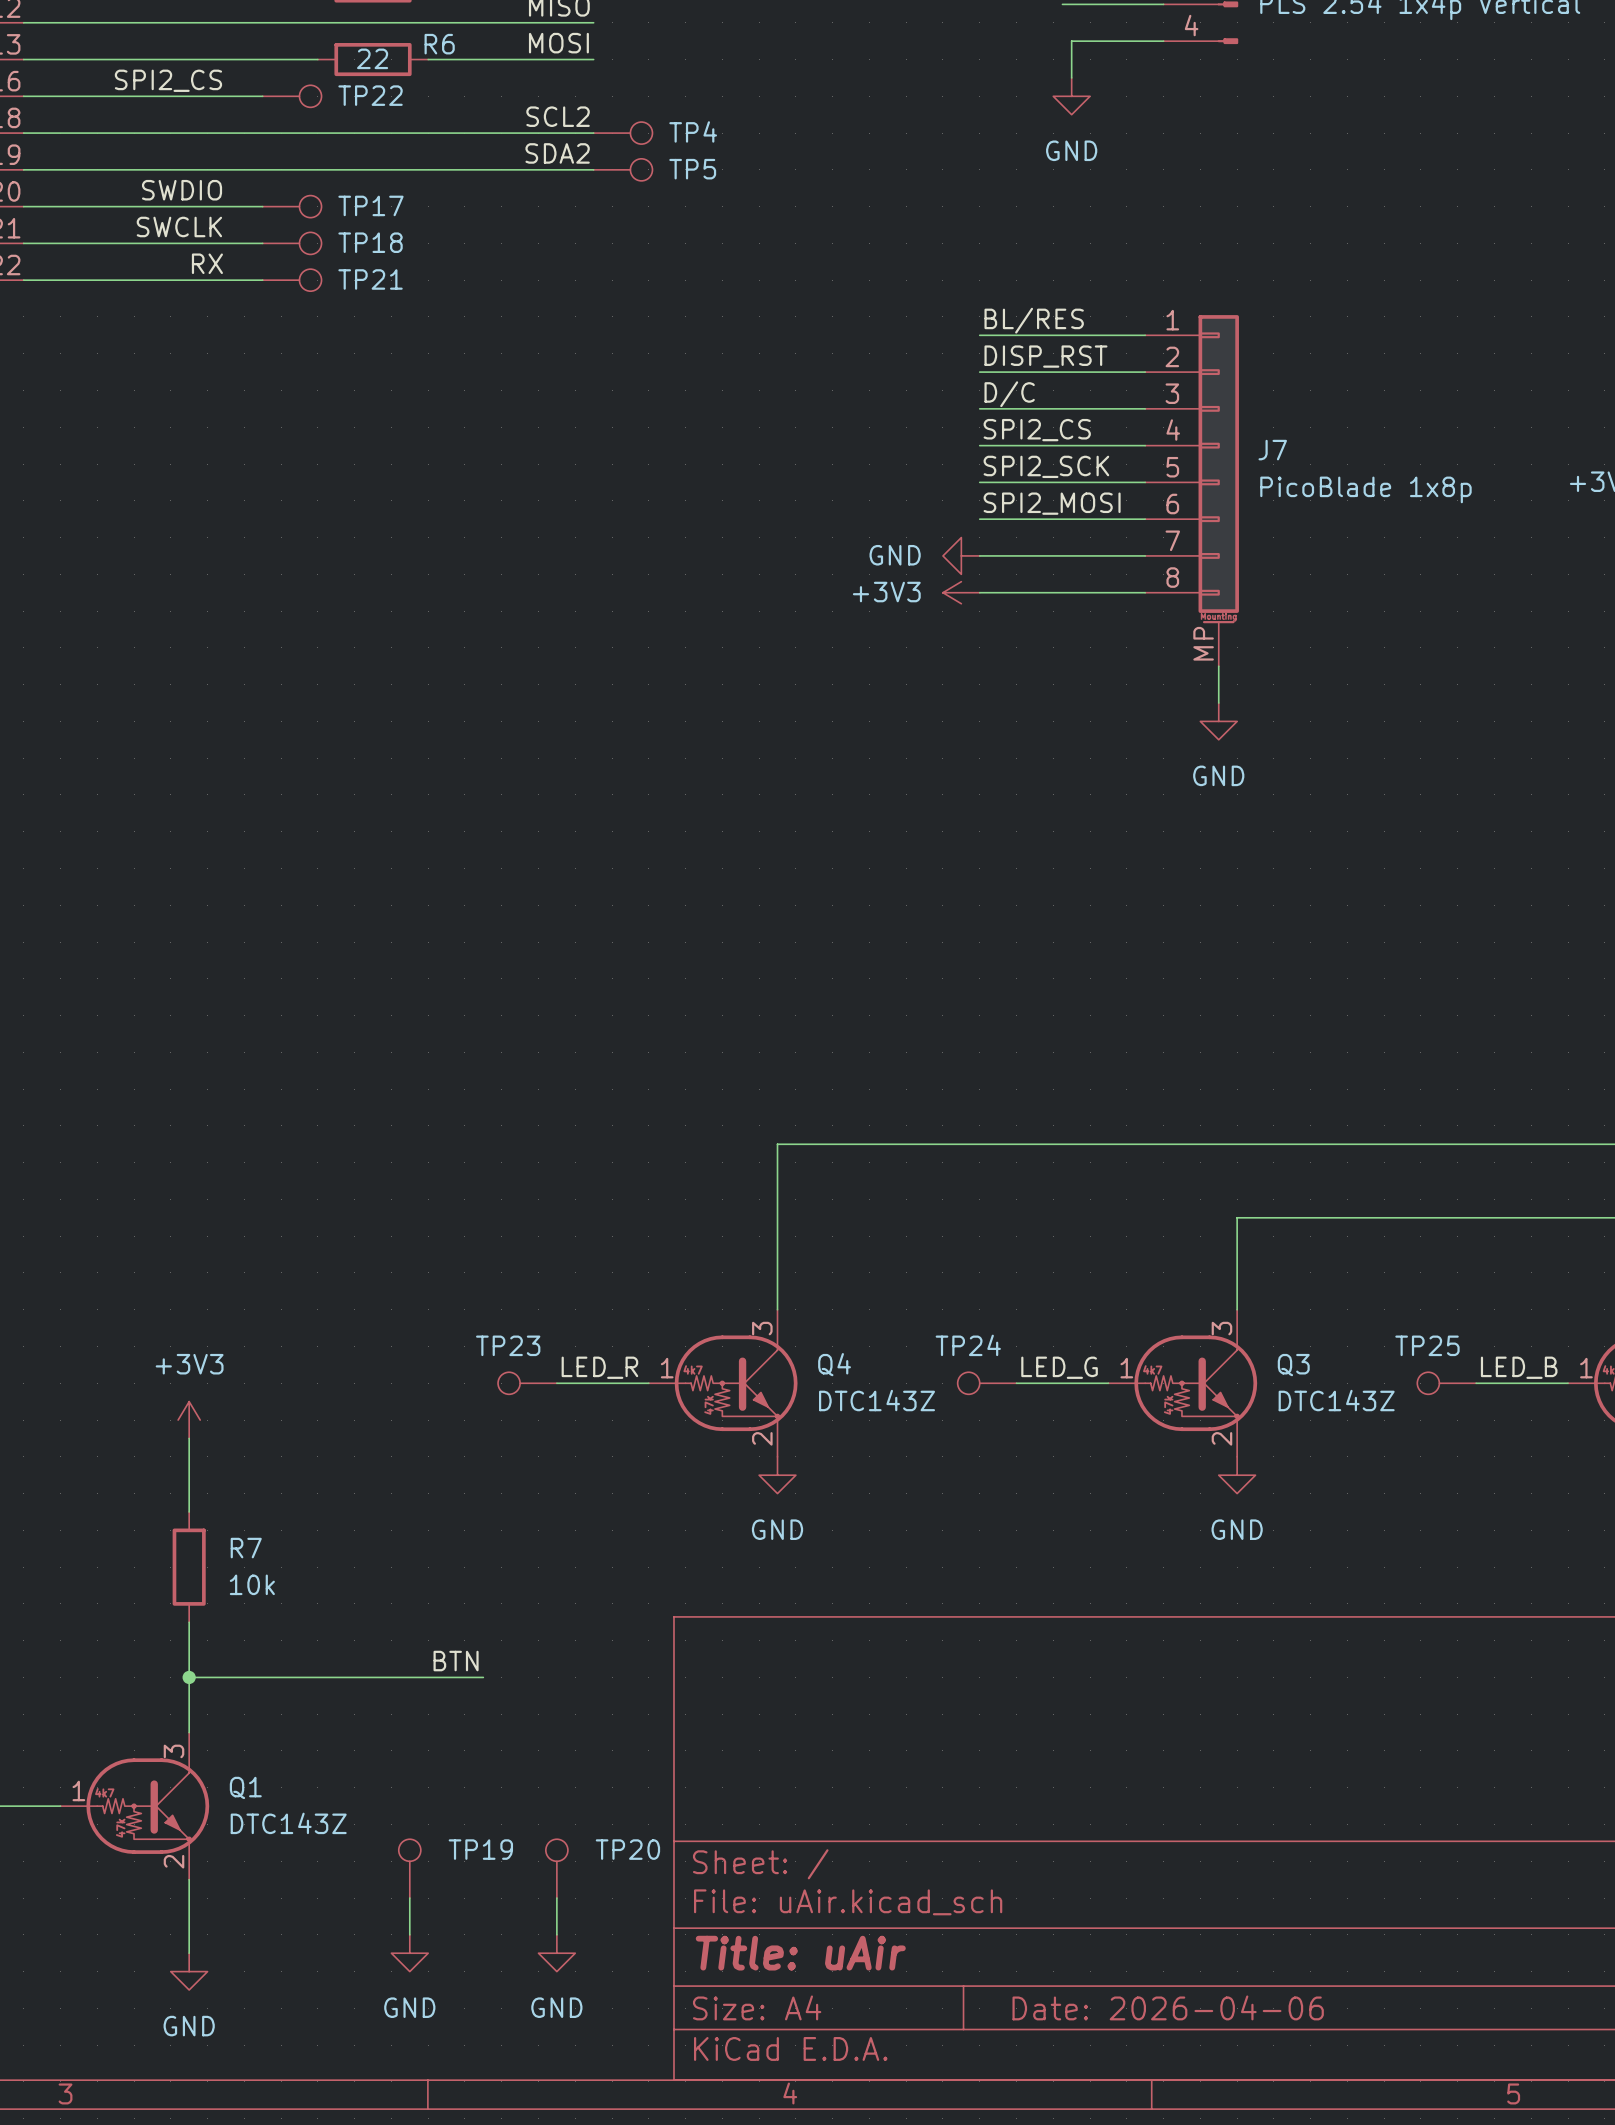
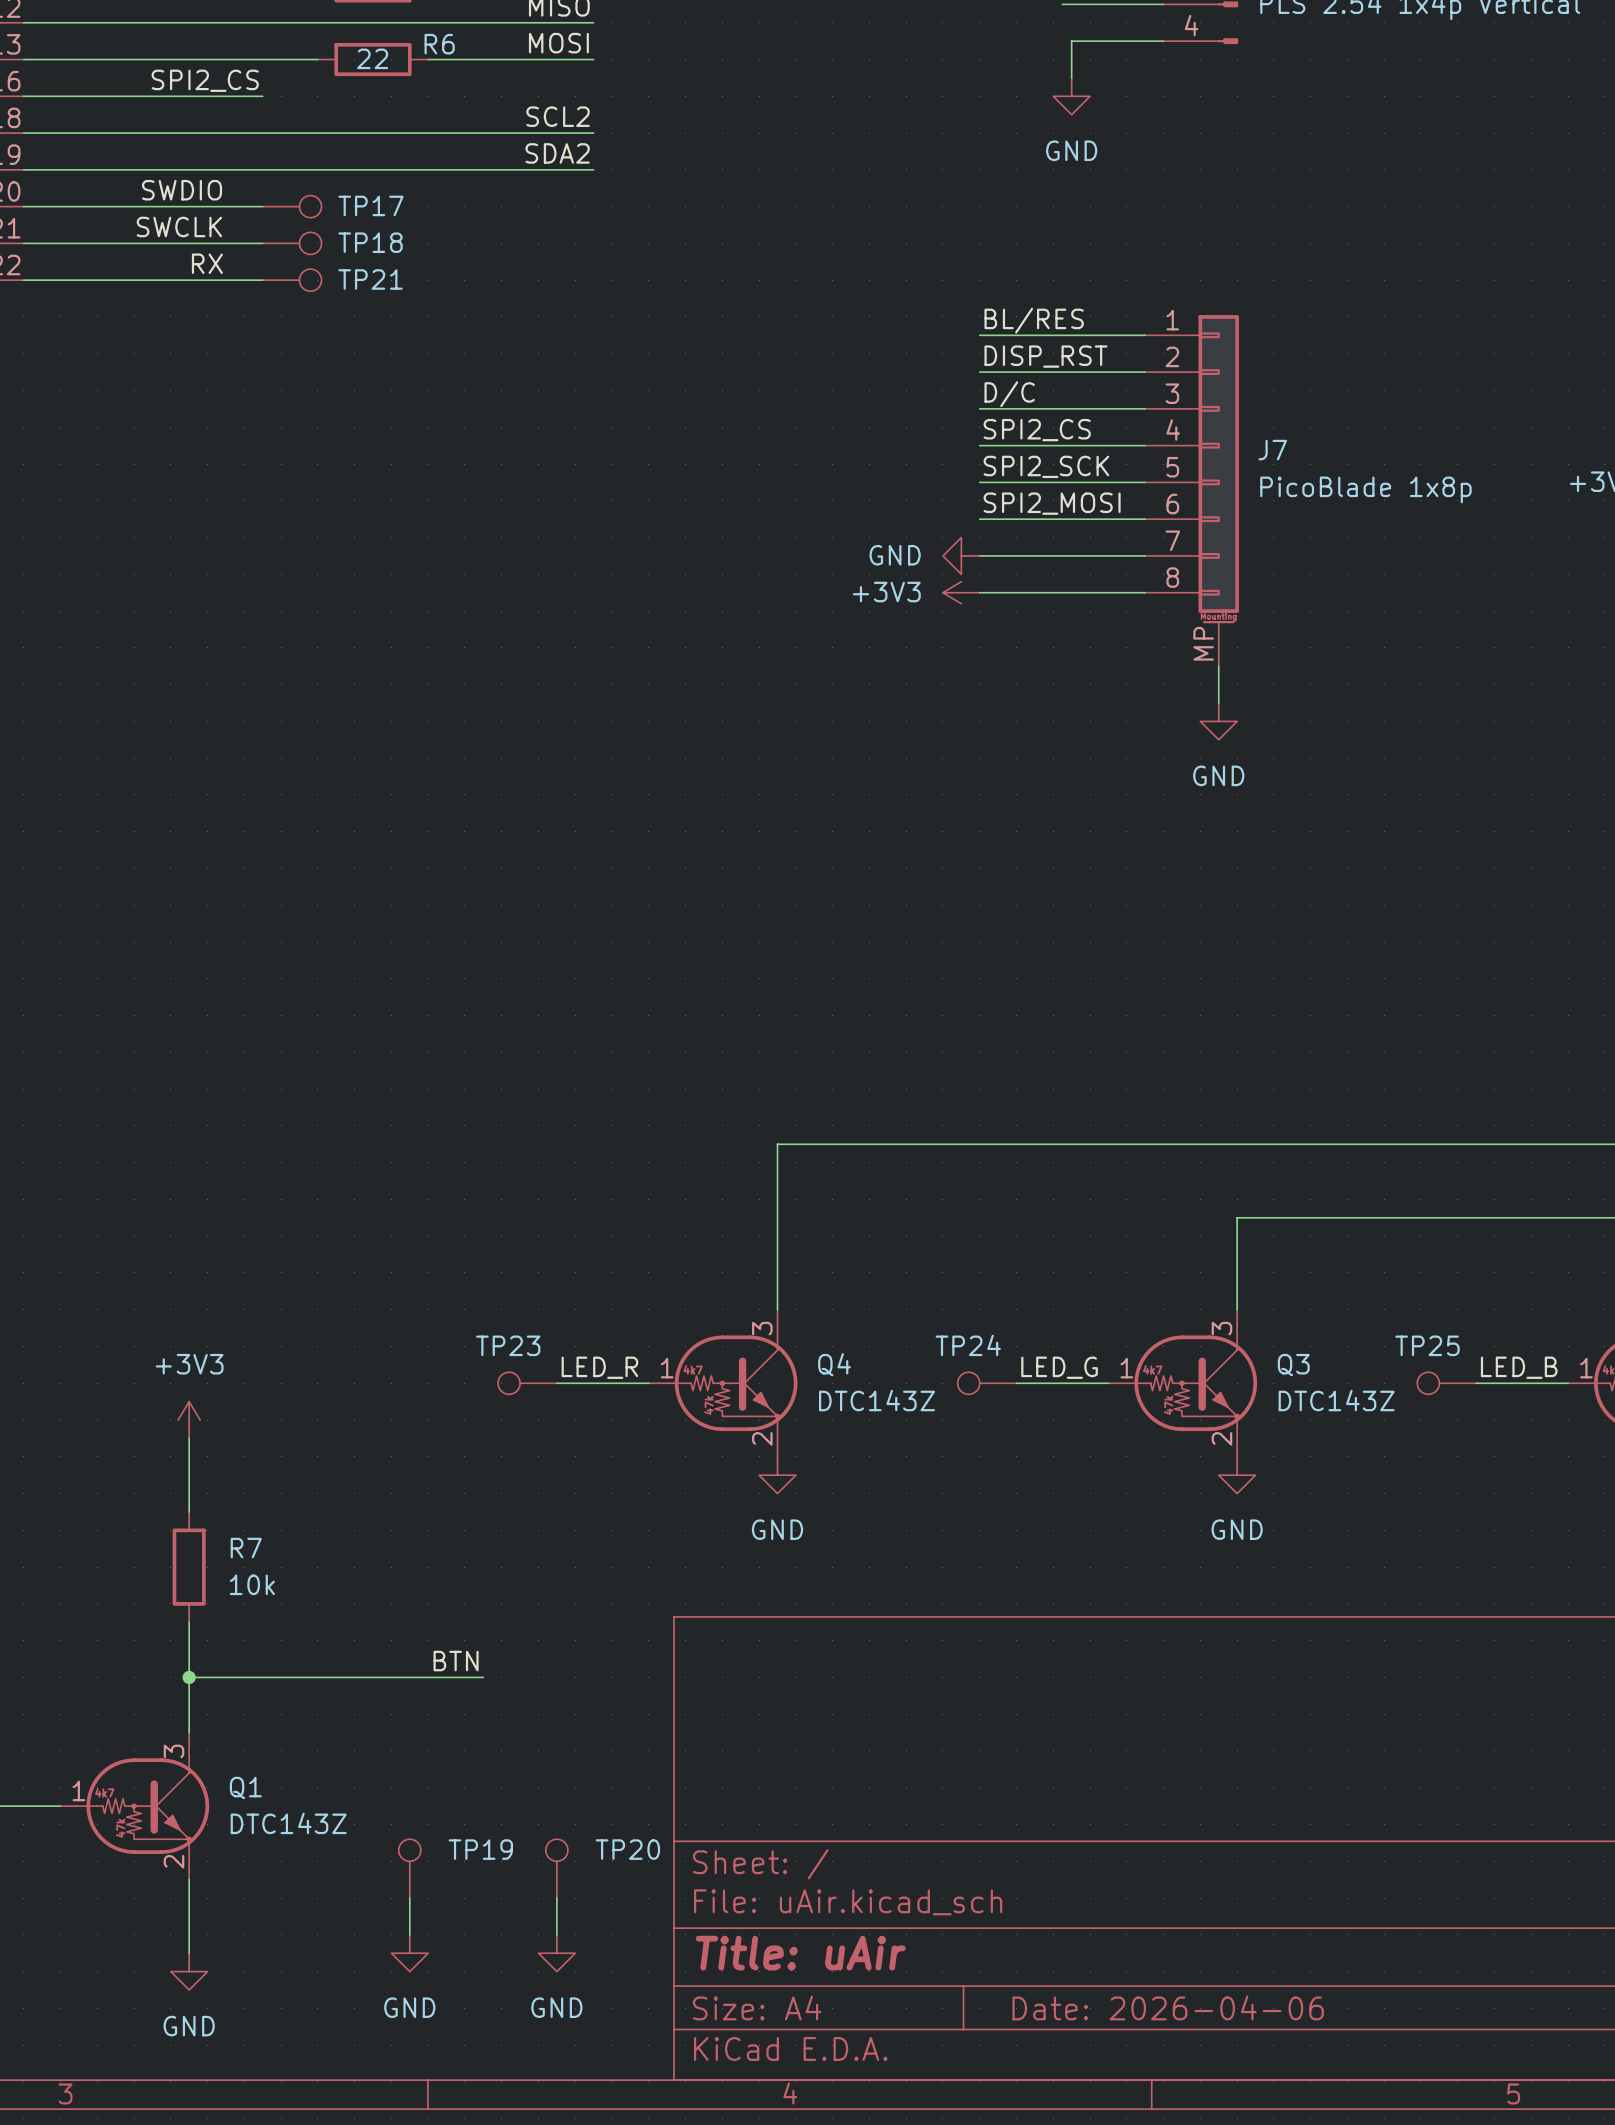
label position: SPI2_CS (168, 80) -> SPI2_CS (205, 80)
TP22: (292, 96) -> none
TP4: (623, 133) -> none
TP5: (623, 169) -> none

